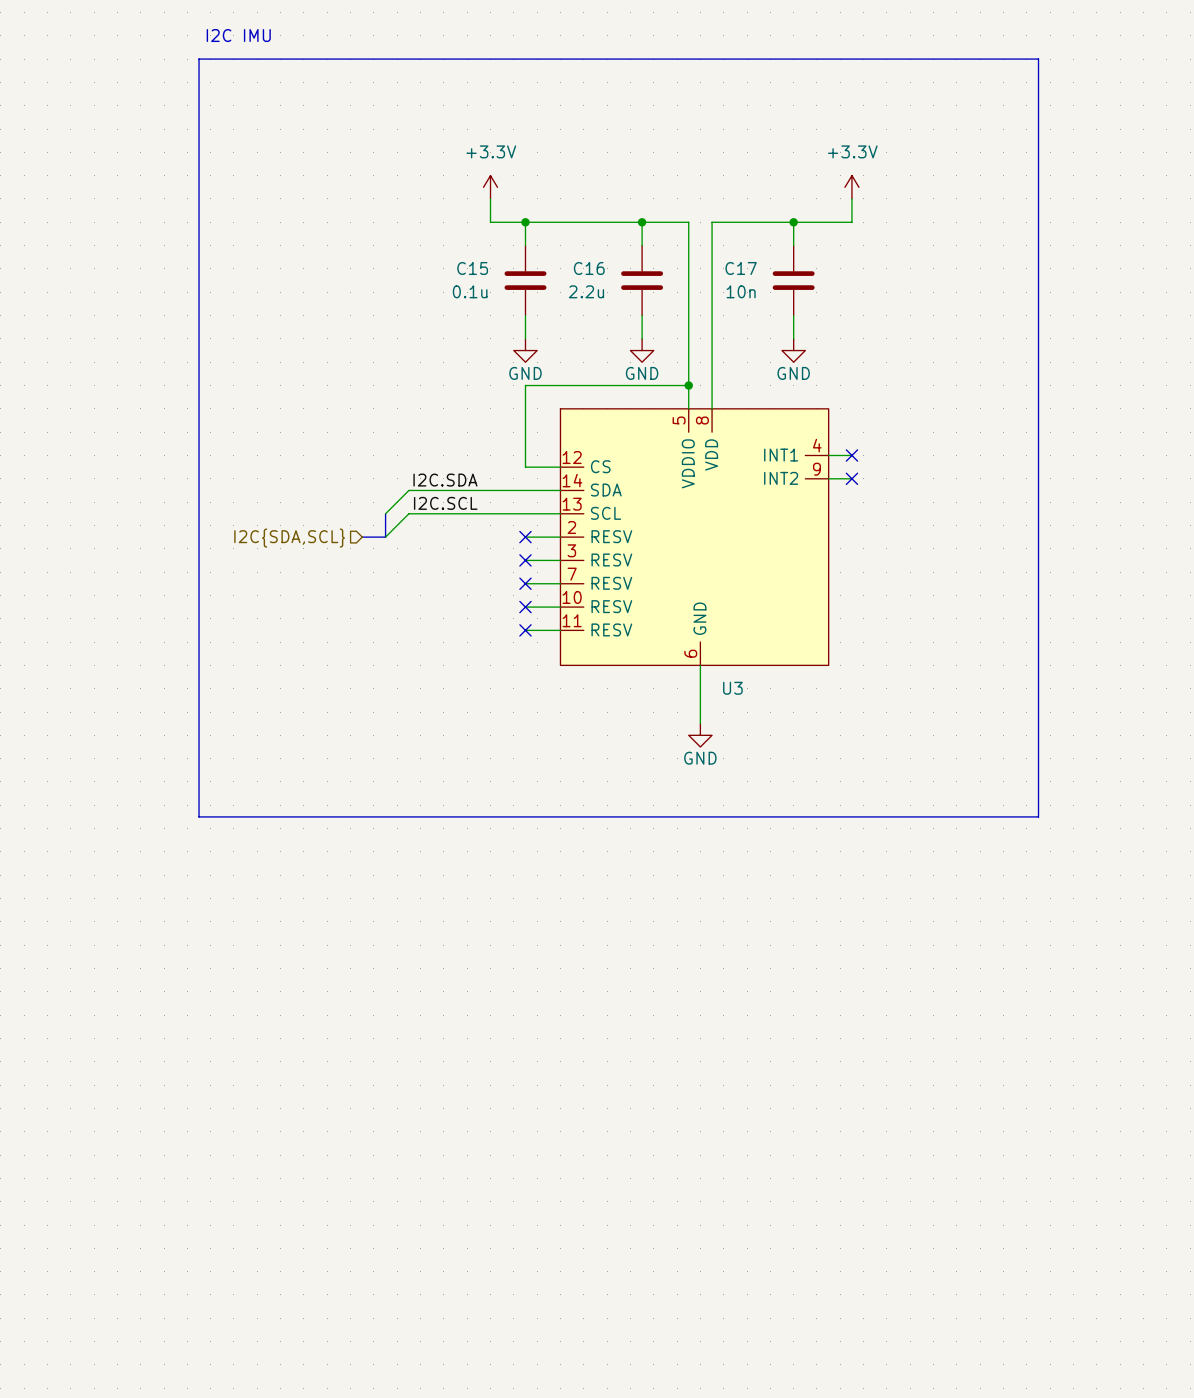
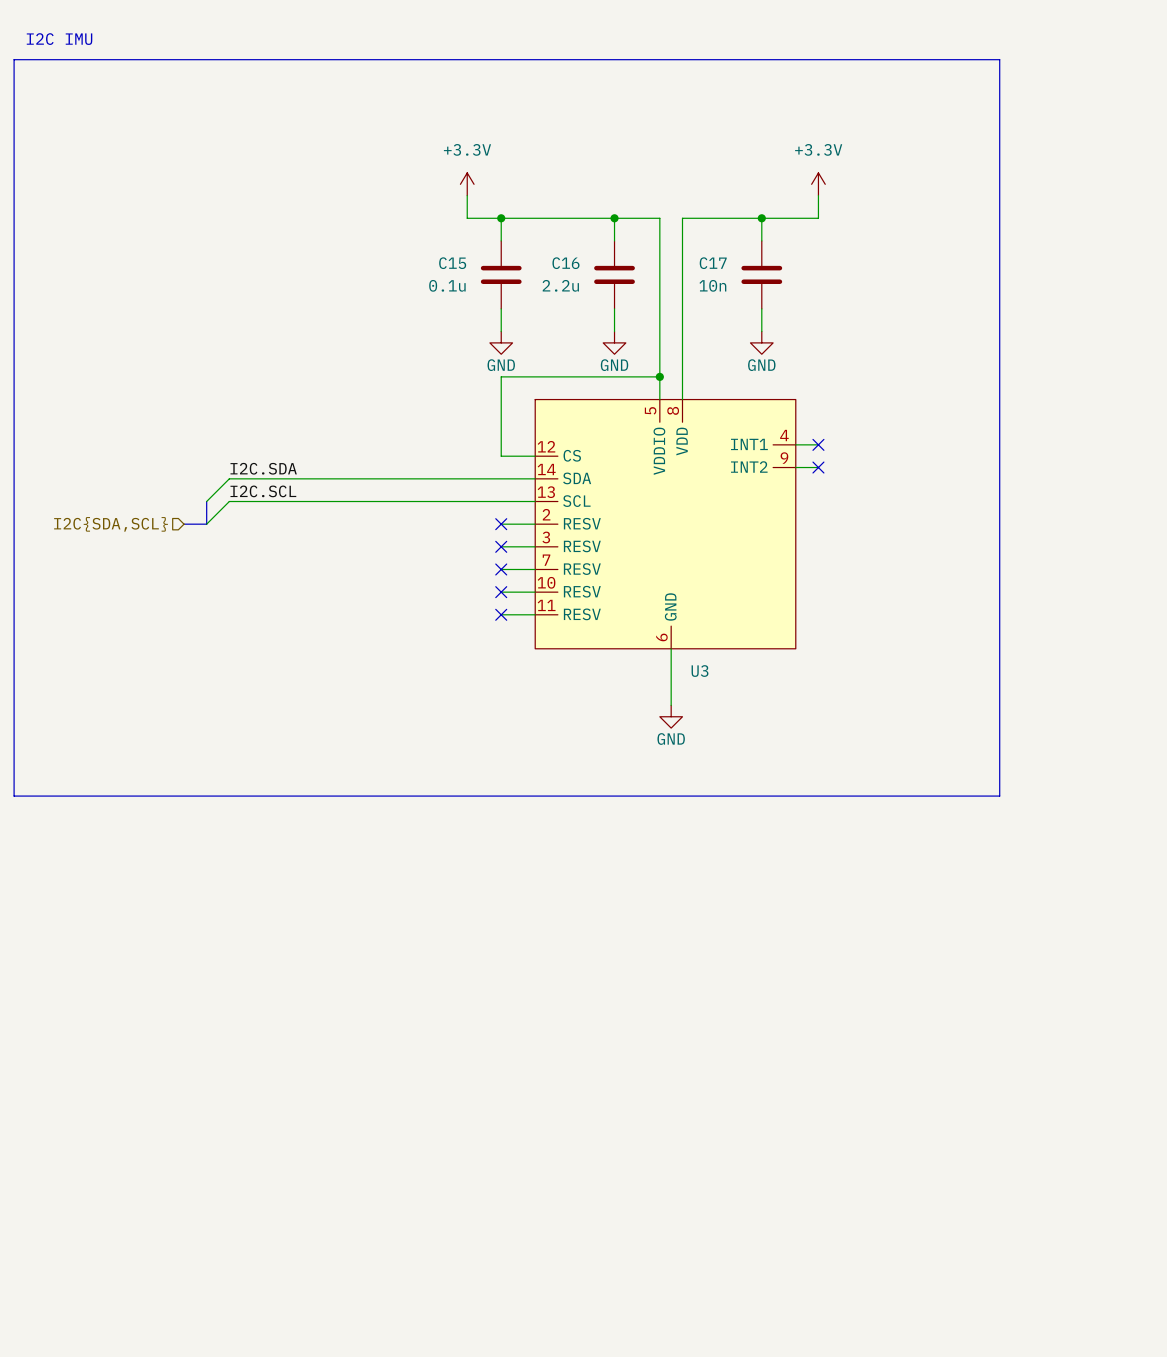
text position: I2C IMU (238, 35) -> I2C IMU (59, 39)
line: (199, 59) (199, 816) -> (184, 59) (14, 59) (14, 796) (184, 796)
label position: I2C.SDA (445, 480) -> I2C.SDA (263, 468)
wire: (408, 490) (385, 513) -> (387, 478) (229, 478) (206, 501)
label position: I2C.SCL (445, 503) -> I2C.SCL (263, 491)
bus: (385, 513) (385, 537) (362, 537) -> (206, 501) (206, 524) (184, 524)
wire: (408, 513) (385, 537) -> (387, 501) (229, 501) (206, 524)
hierarchical label position: I2C{SDA,SCL} (289, 538) -> I2C{SDA,SCL} (111, 524)

